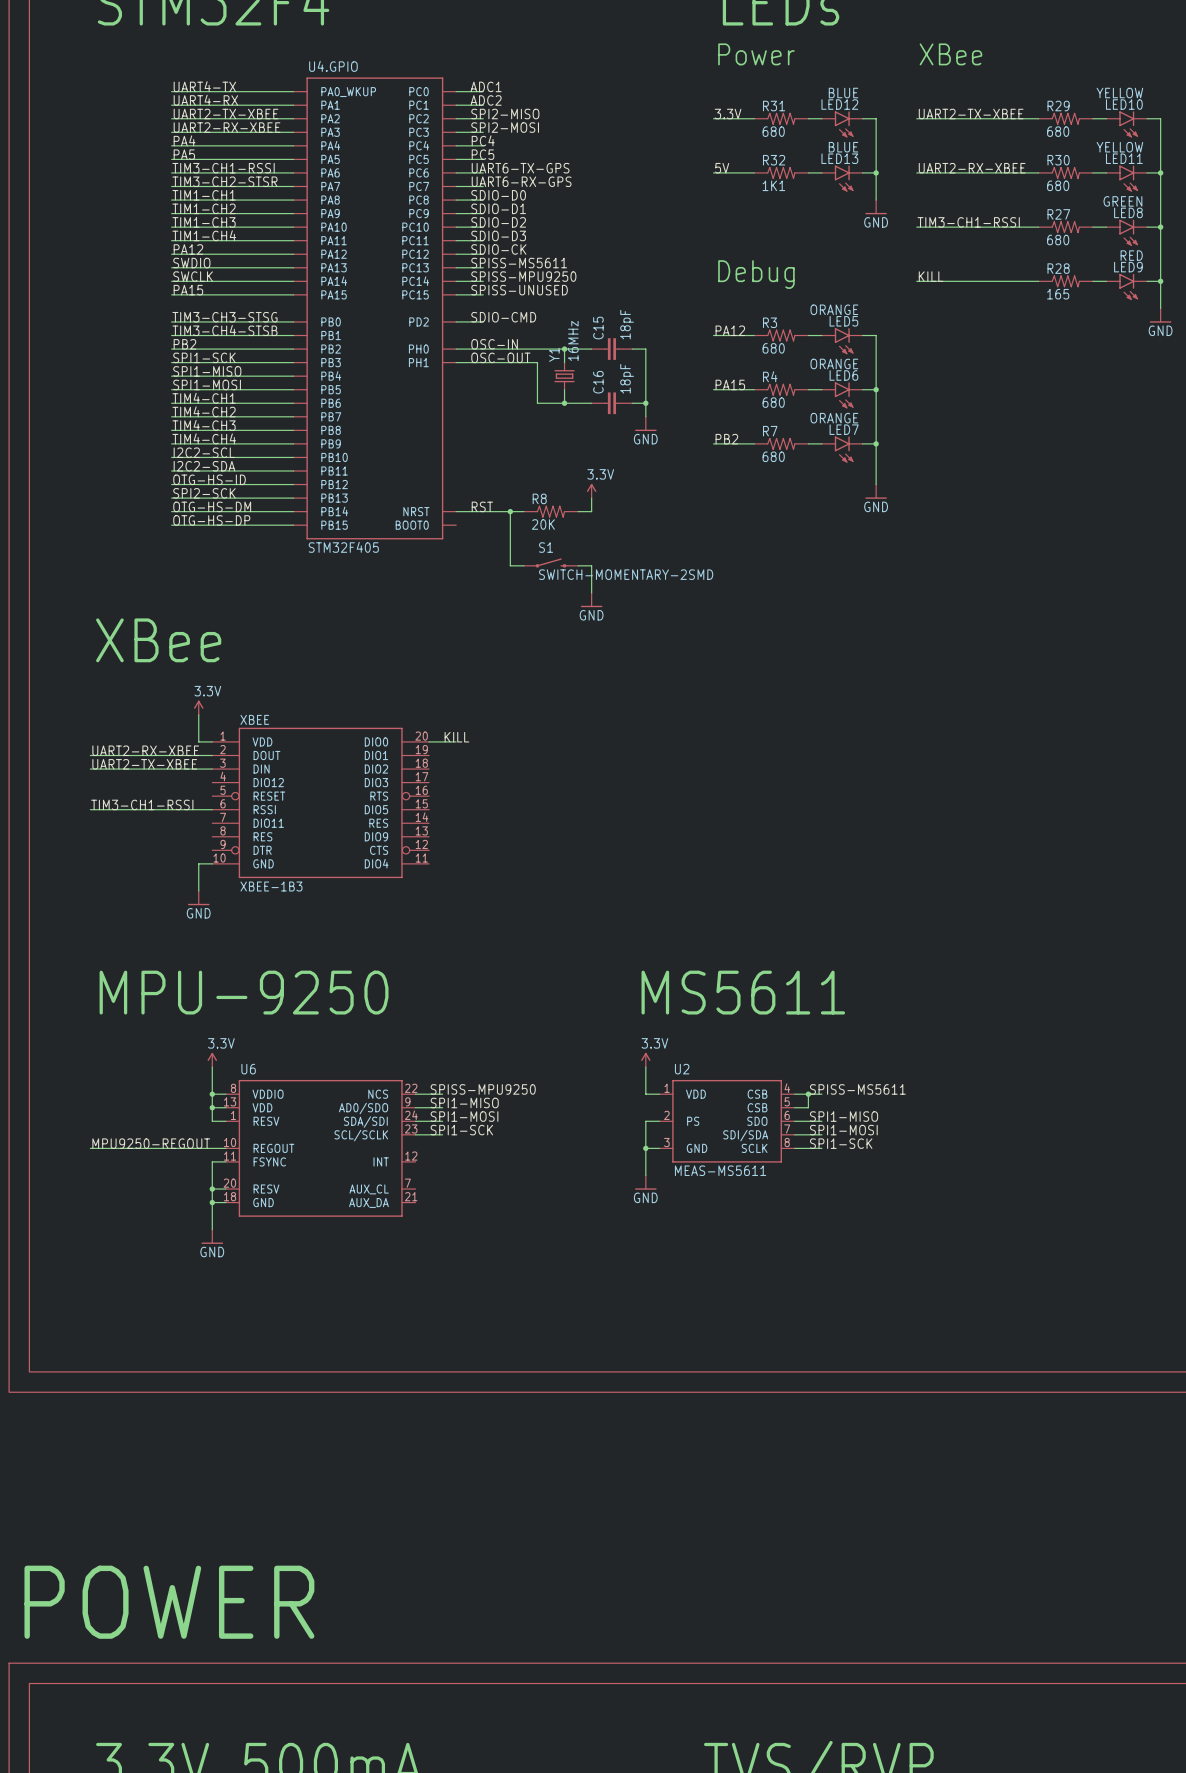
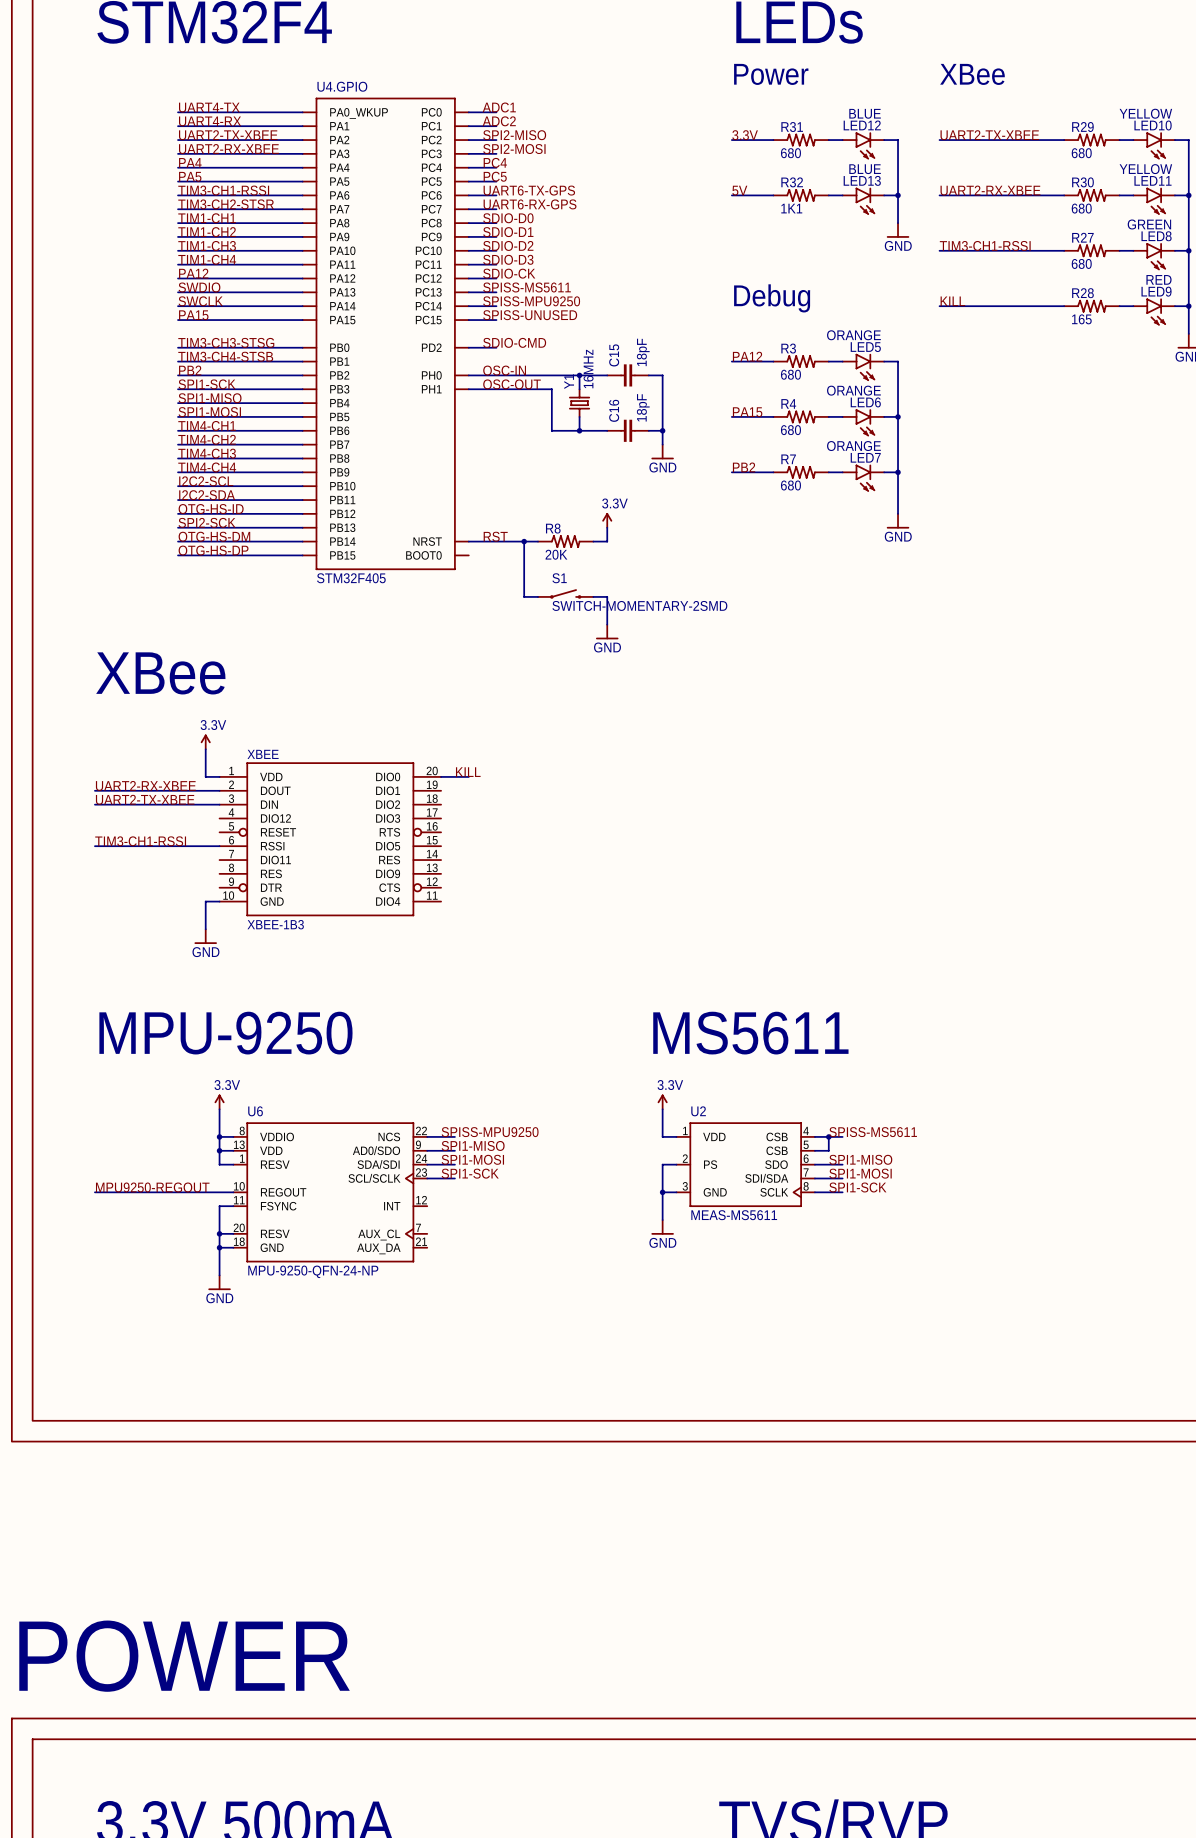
U6 symbol: [225, 1079, 416, 1217] -> [233, 1122, 428, 1263]
U2 symbol: [659, 1079, 795, 1163] -> [676, 1122, 815, 1207]
U6 value: none -> MPU-9250-QFN-24-NP (313, 1271)

